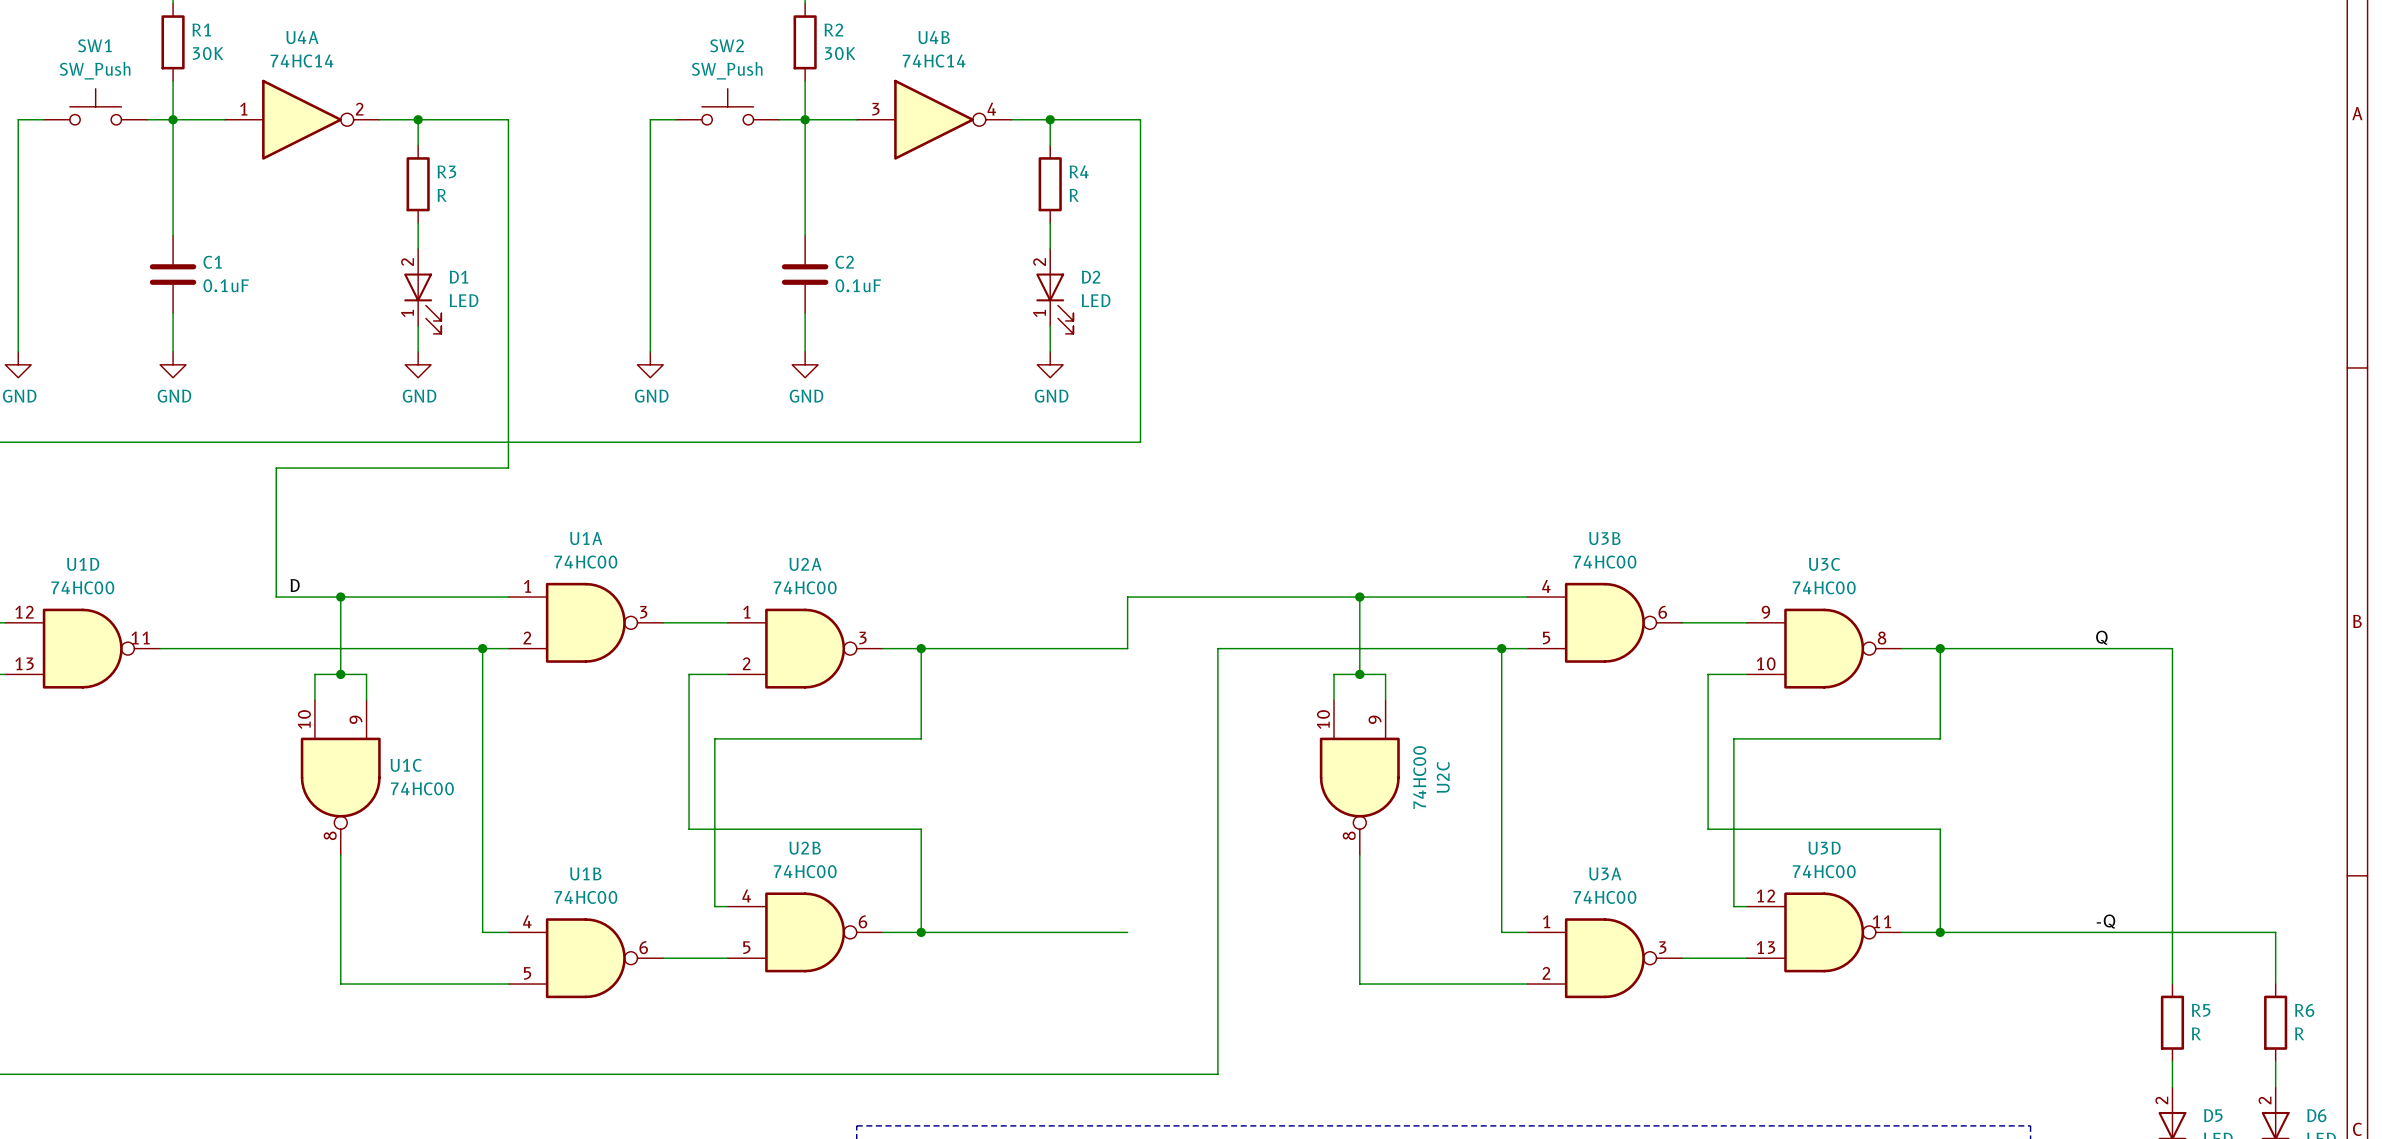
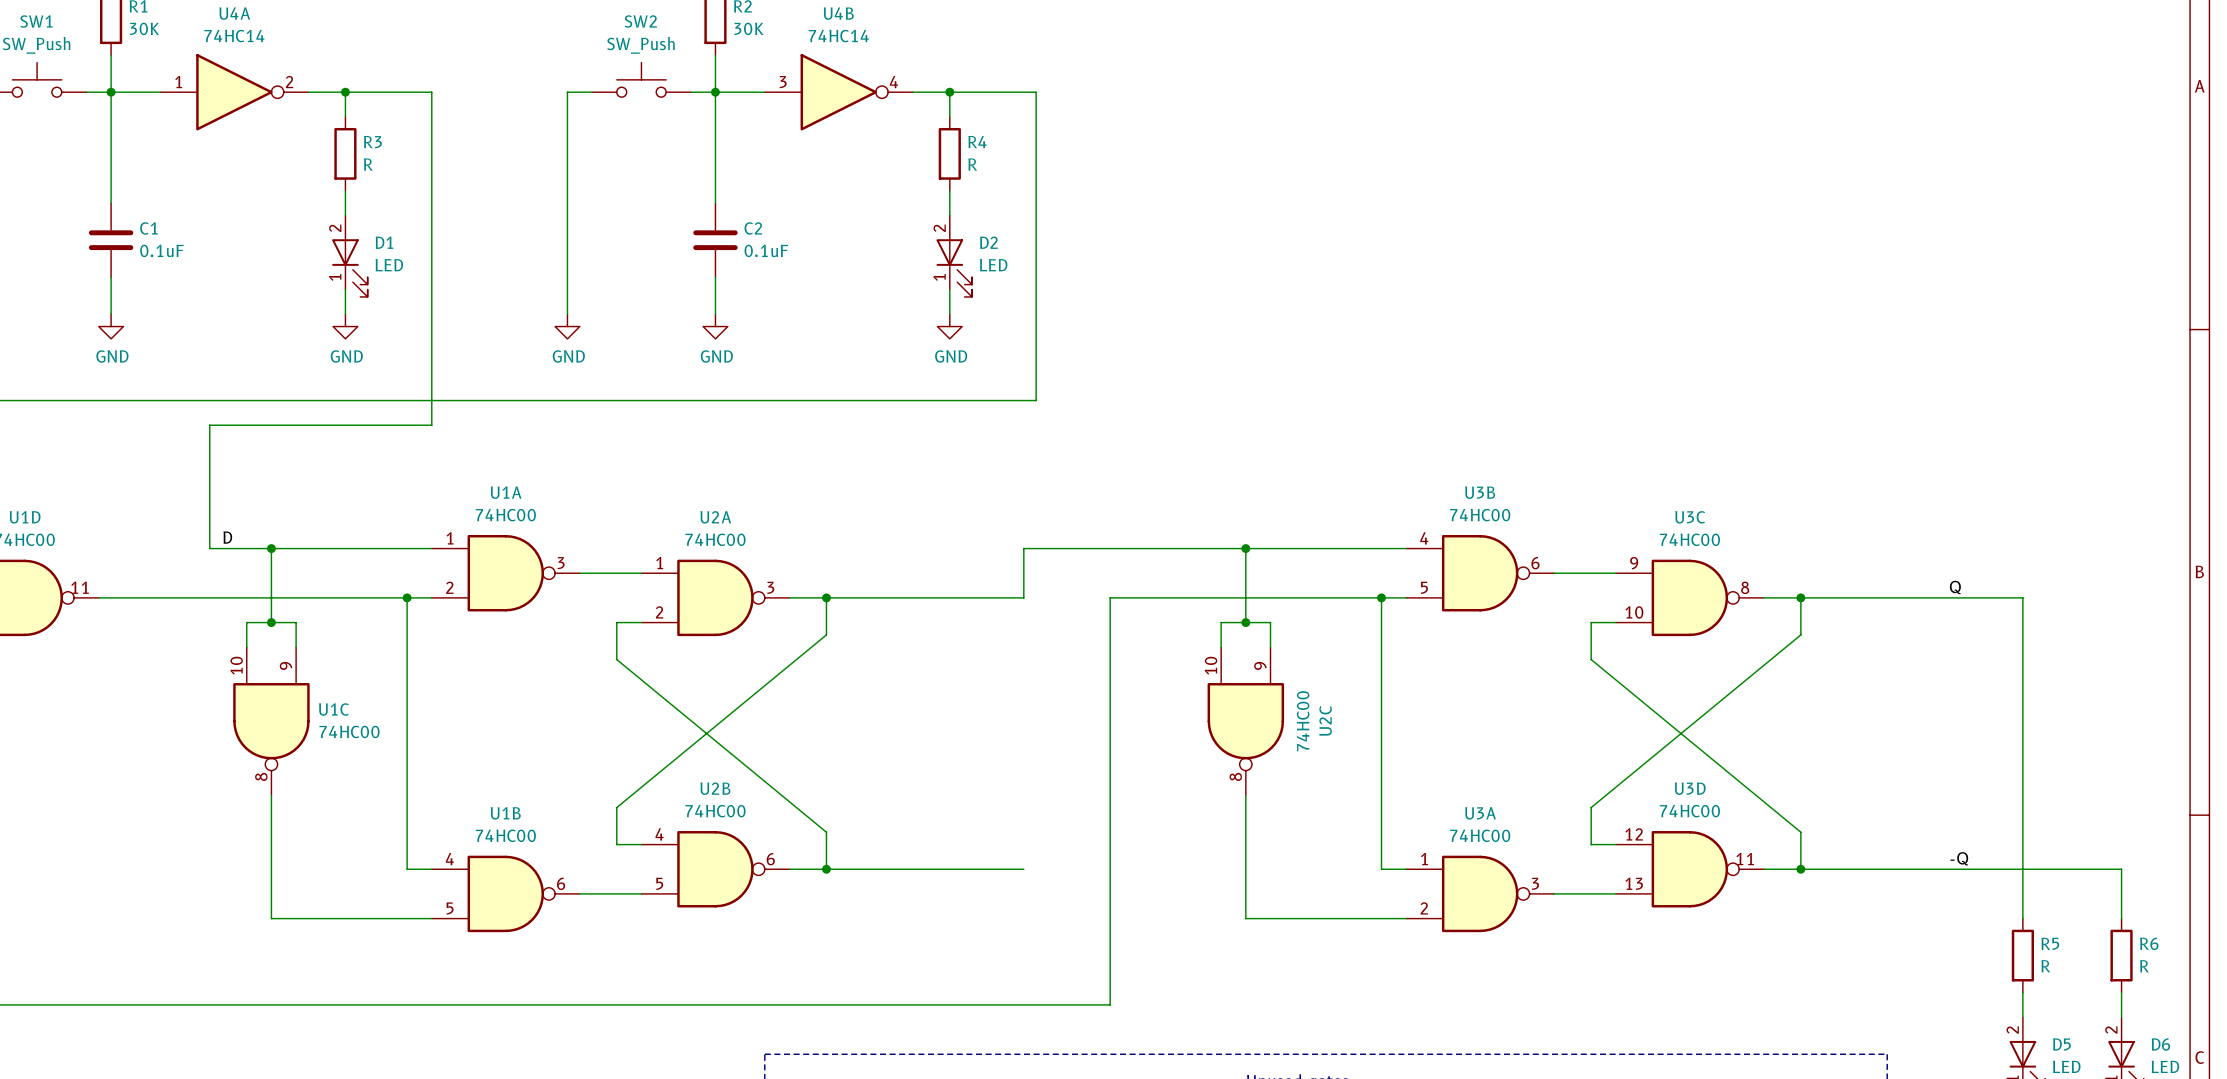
wire: (701, 674) (689, 674) (689, 829) (921, 829) (921, 893) -> (616, 622) (616, 659) (826, 832)
wire: (1720, 674) (1708, 674) (1708, 829) (1940, 829) (1940, 893) -> (1591, 622) (1591, 659) (1800, 832)
wire: (921, 687) (921, 738) (714, 738) (714, 906) -> (826, 634) (616, 807) (616, 844) (629, 844)
wire: (1940, 687) (1940, 738) (1733, 738) (1733, 906) -> (1800, 634) (1591, 807) (1591, 844) (1603, 844)

